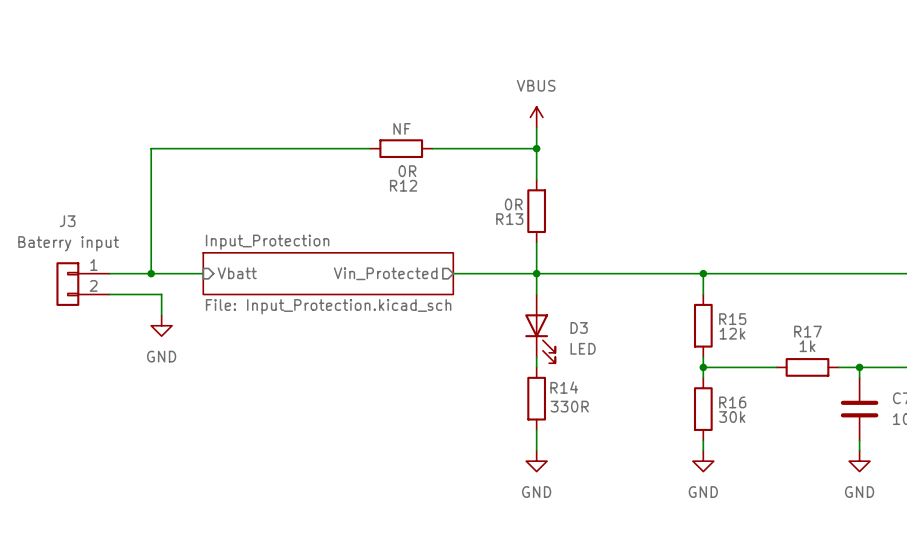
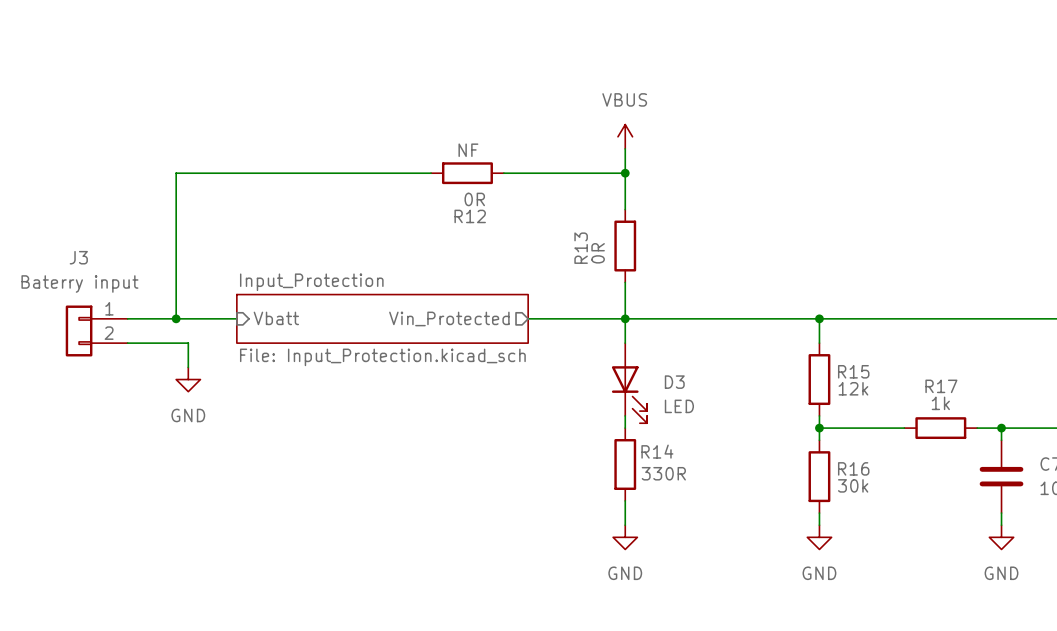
R13 value rotation: 0° (513, 204) -> 90° counterclockwise (598, 253)
R13 name rotation: 0° (509, 219) -> 90° counterclockwise (581, 248)

